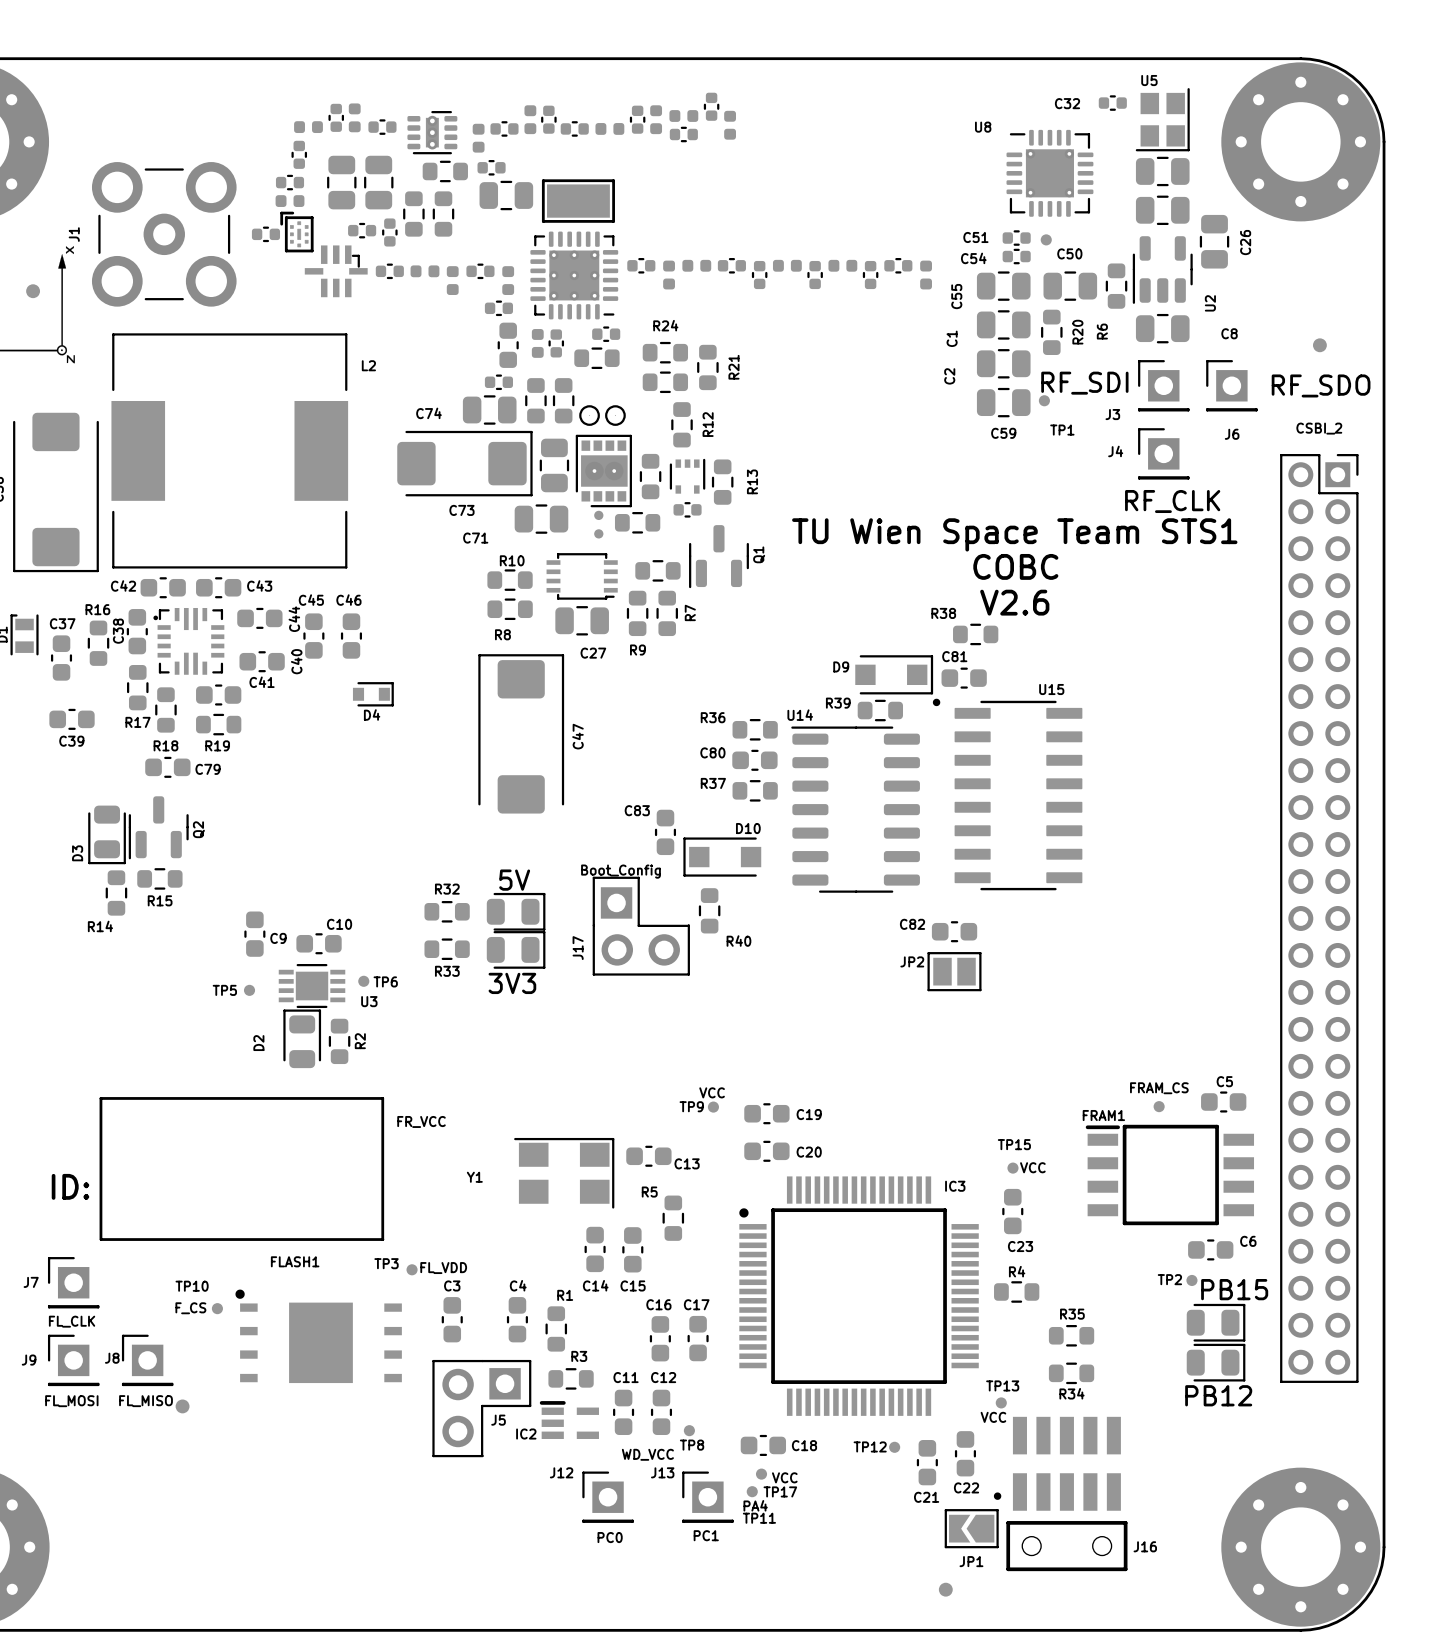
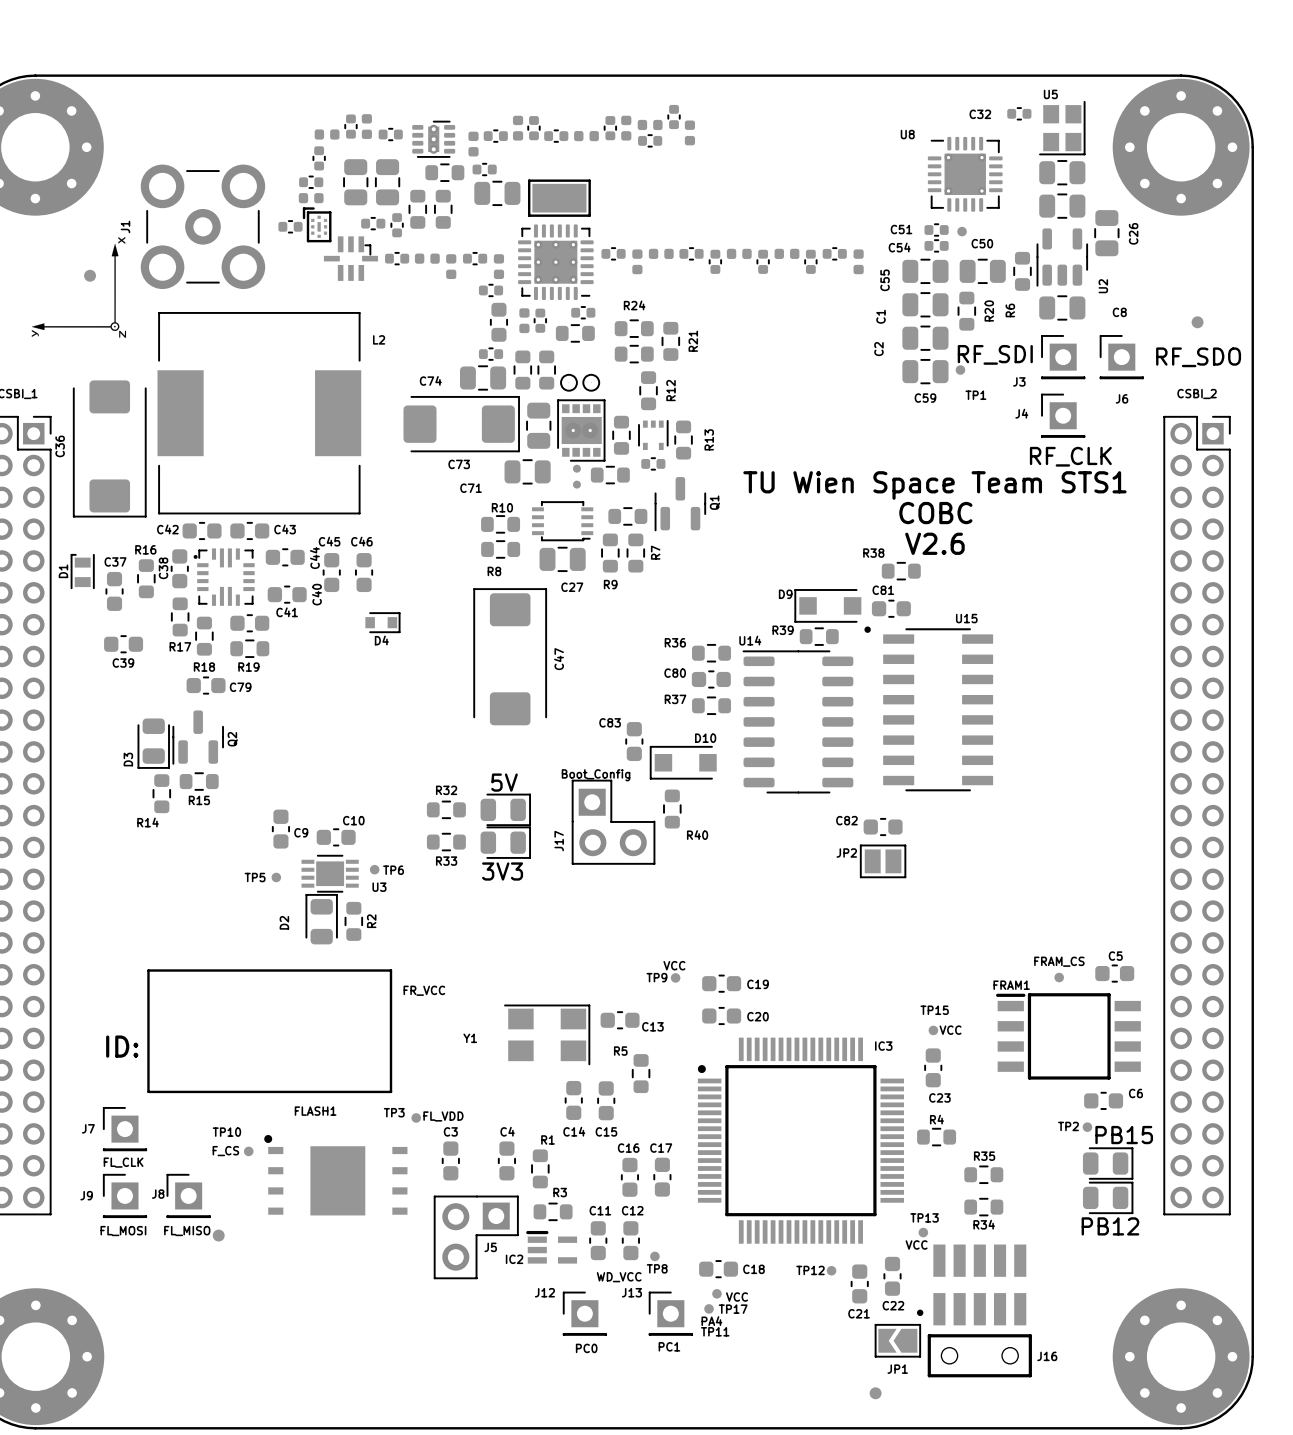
D9 rotation: 0° (894, 674) -> 180° (827, 605)

